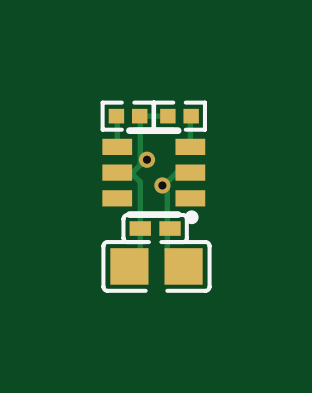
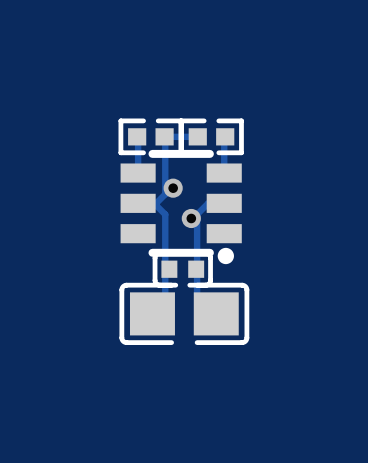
part footprint: [121, 212, 189, 245] -> [152, 250, 213, 288]

